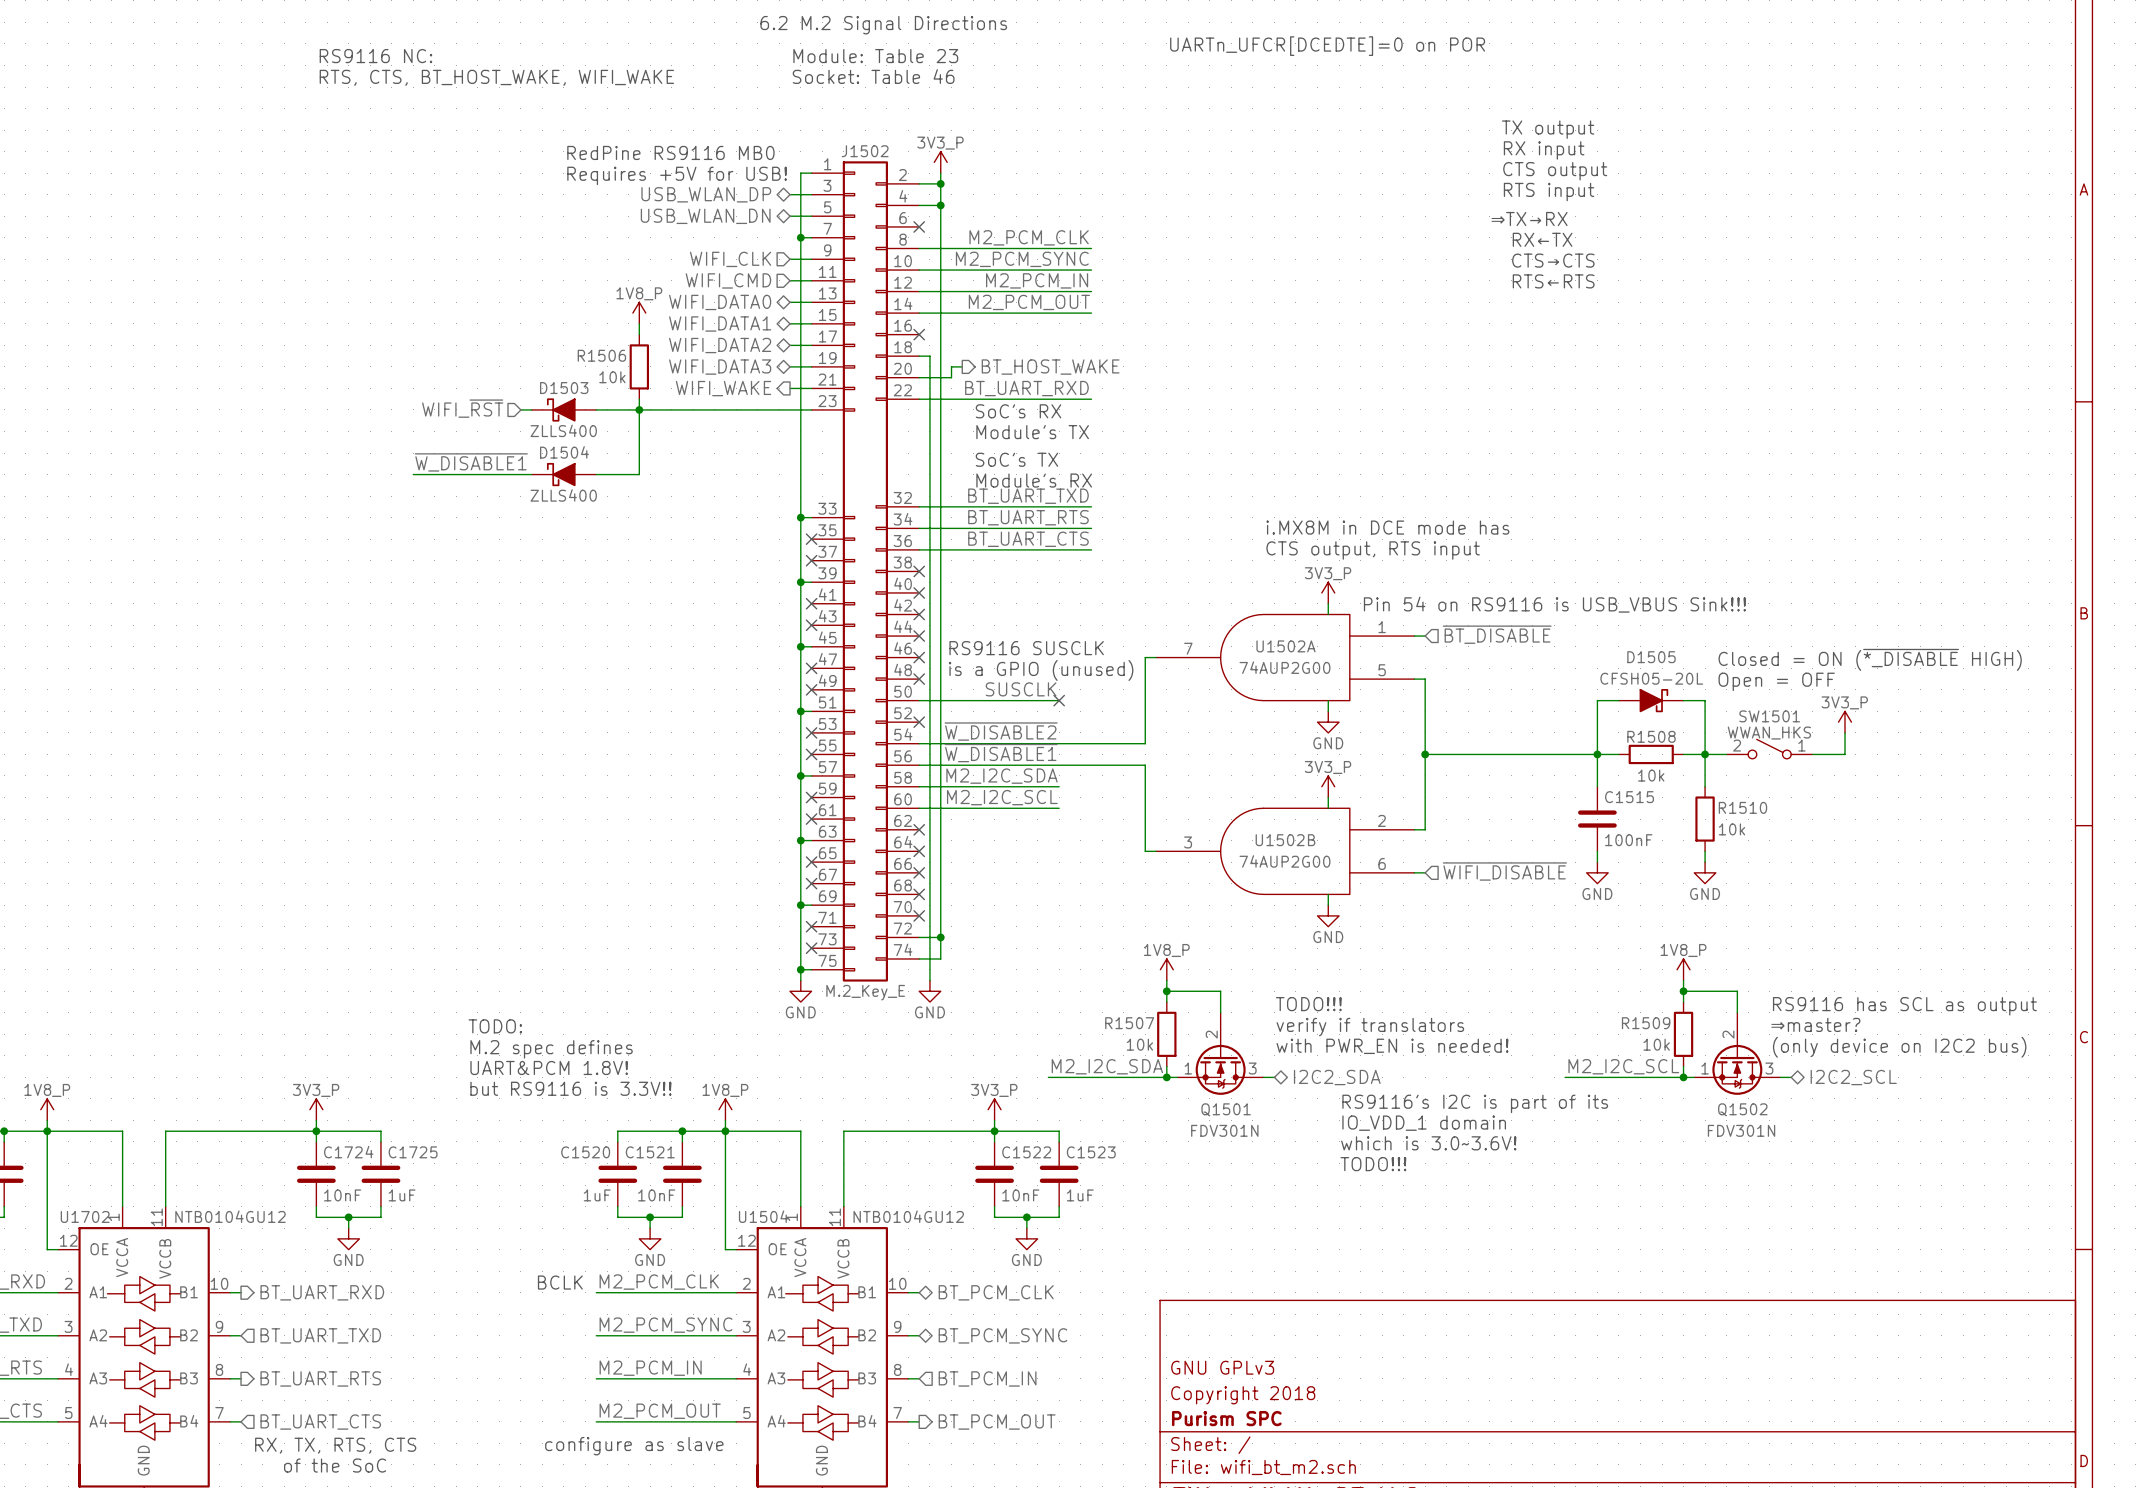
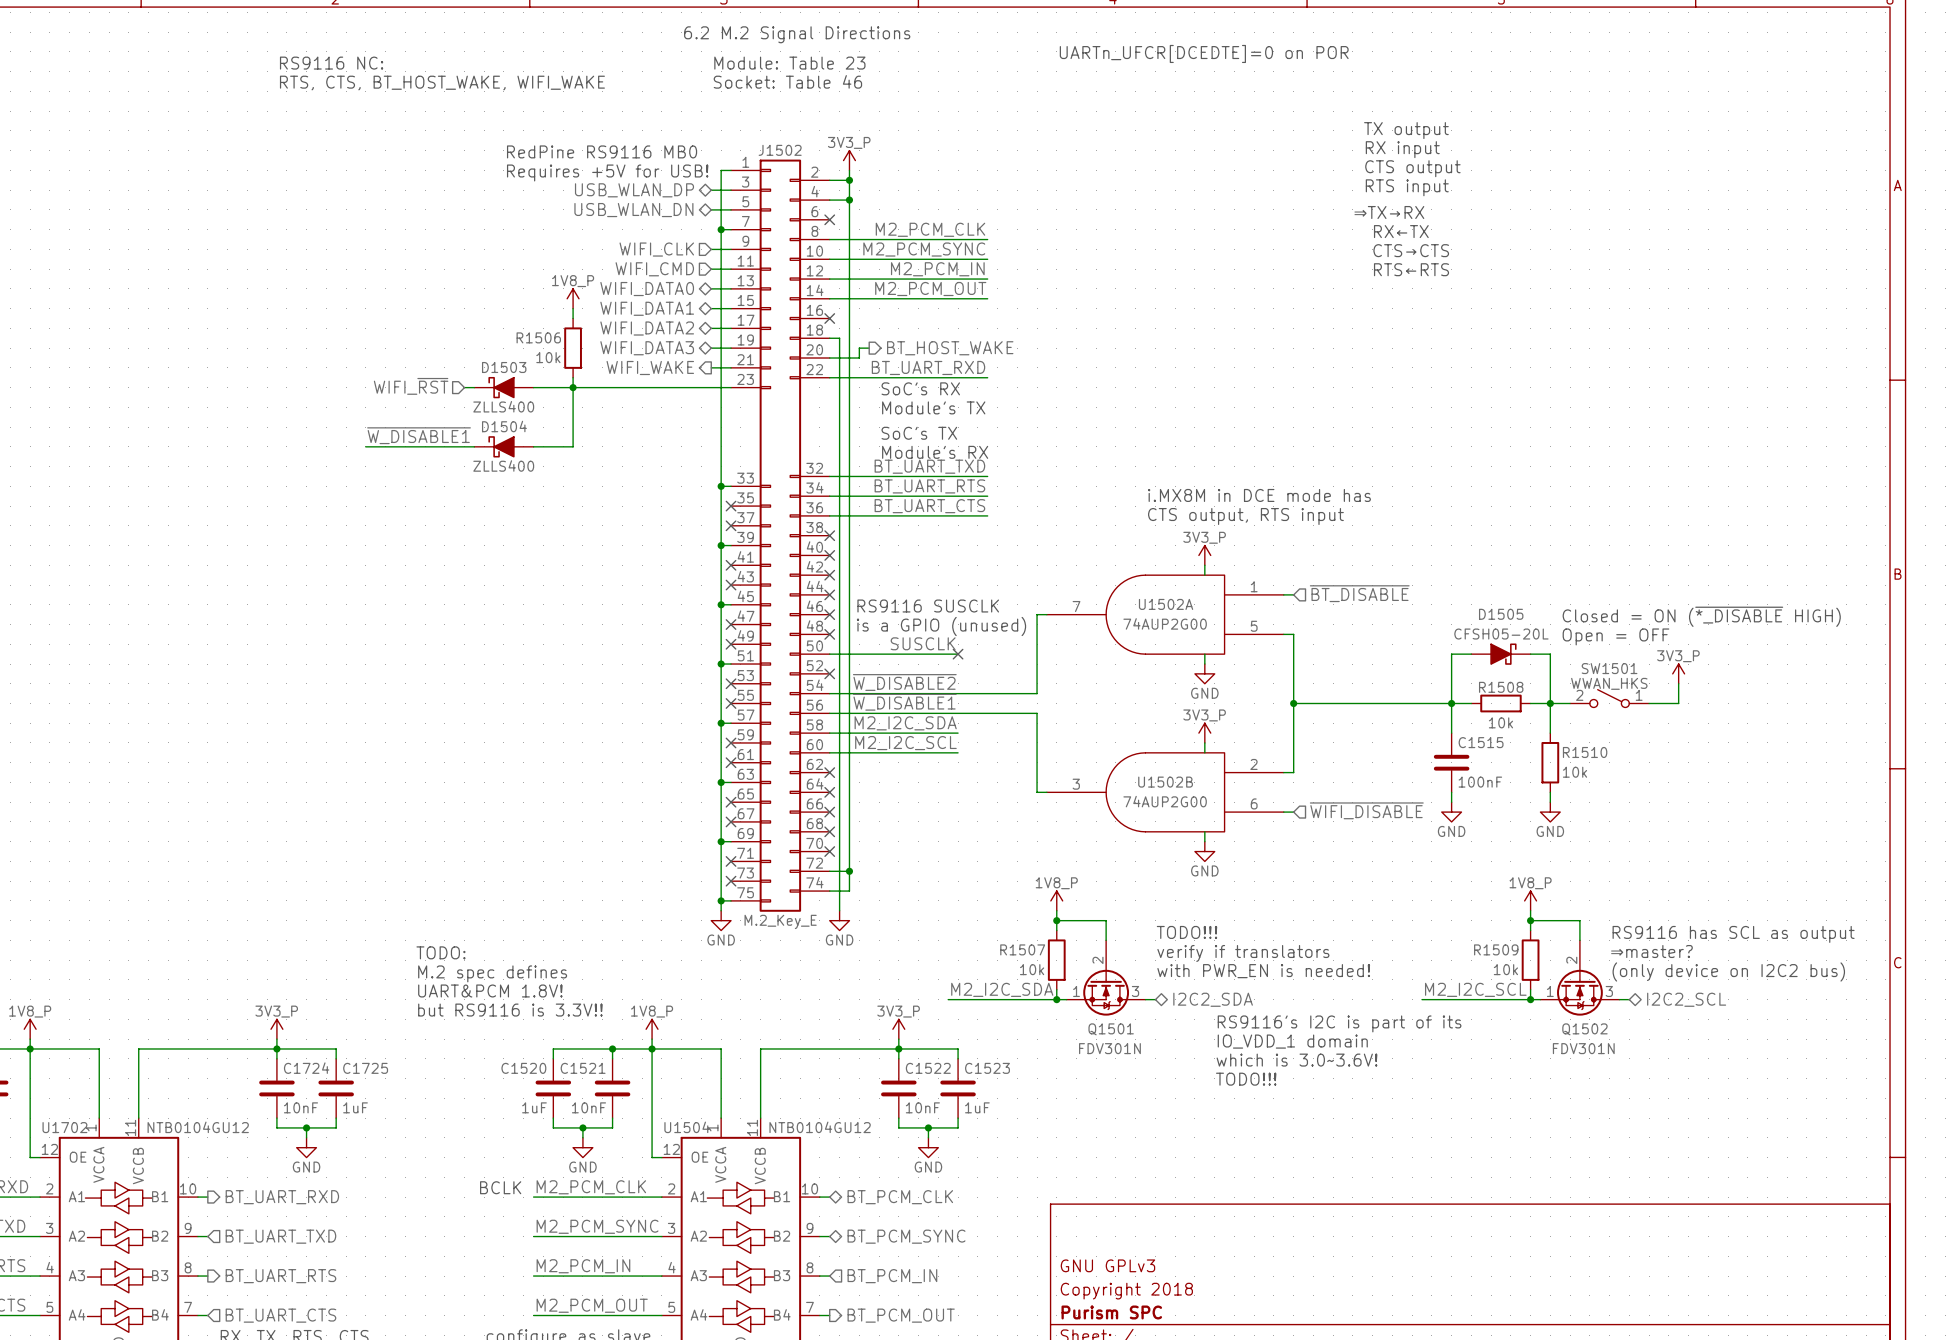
text: Pin 54 on RS9116 is USB_VBUS Sink!!! (1554, 604) -> none

